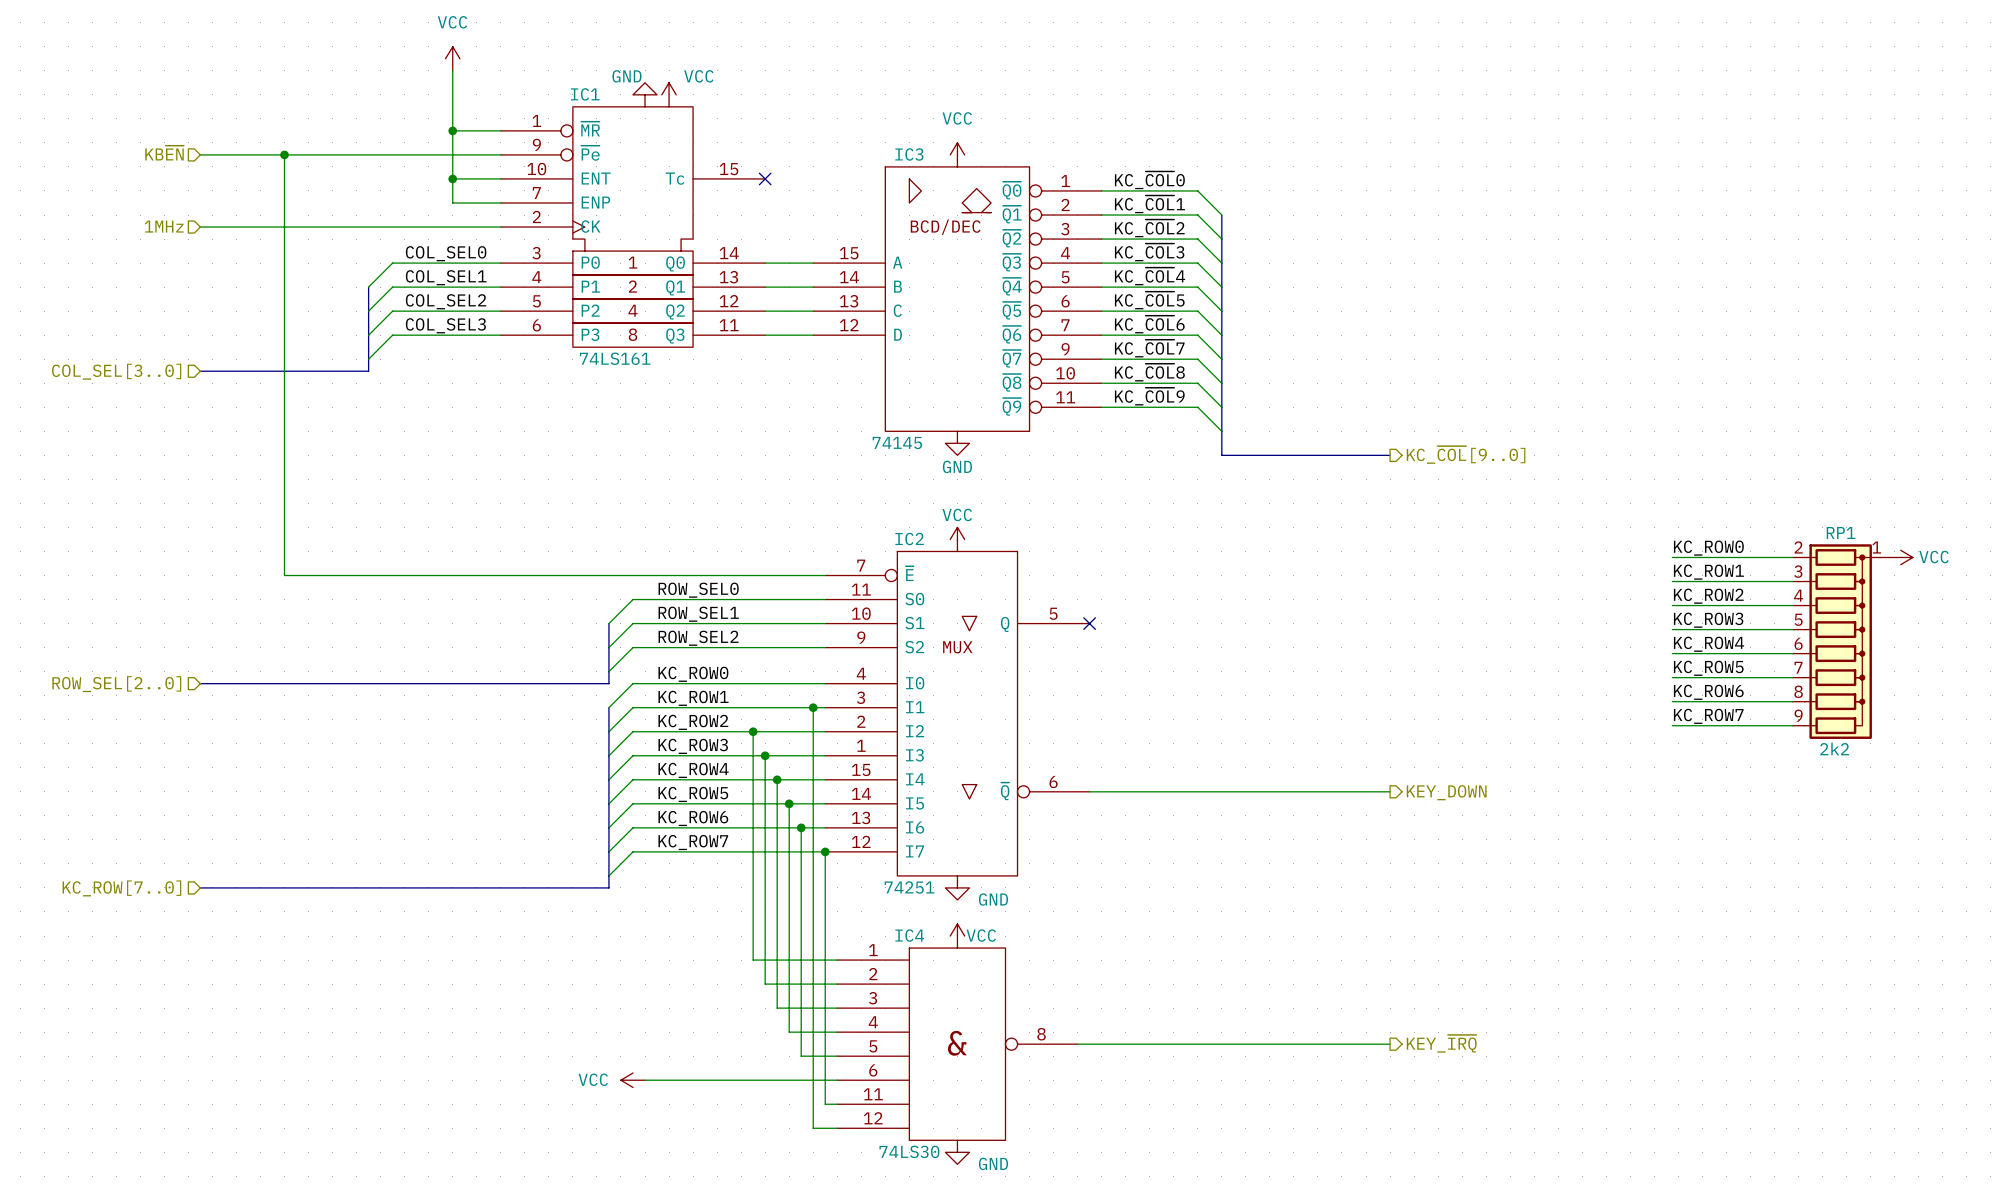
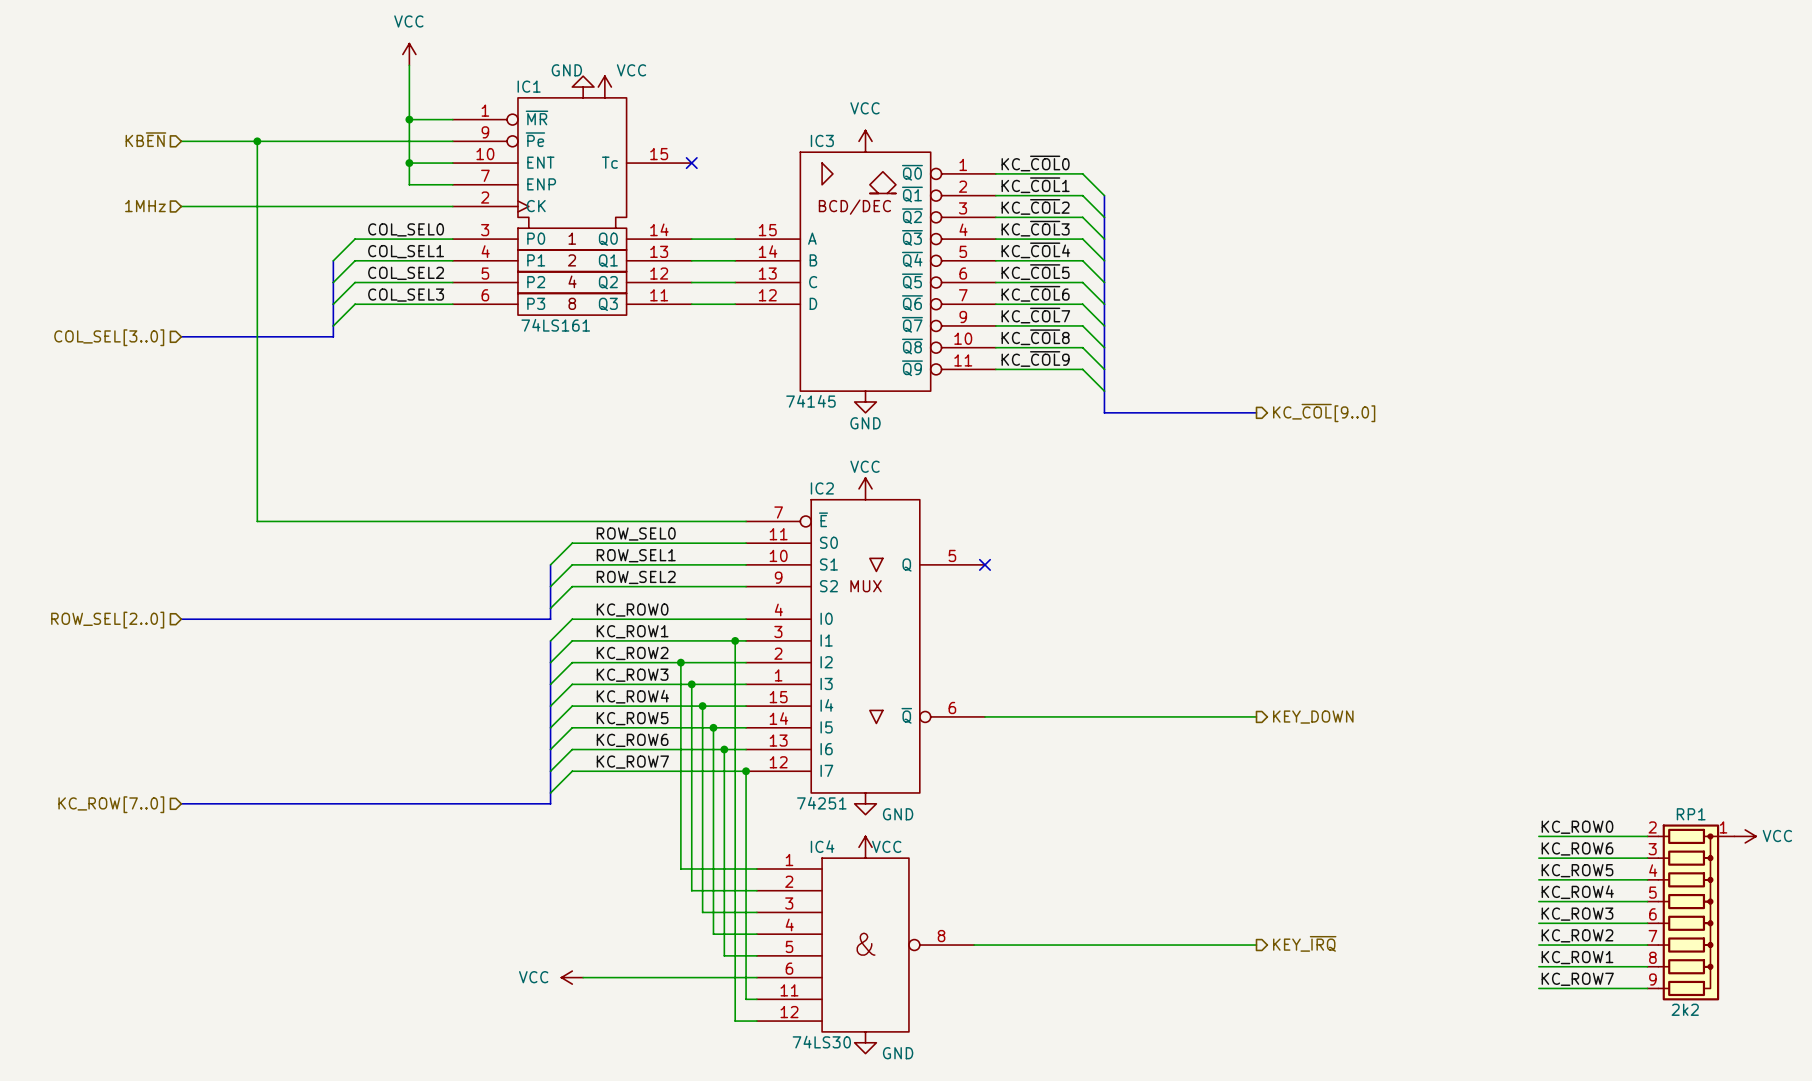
label: KC_ROW0 (1708, 548) -> none
wire: (1672, 557) (1792, 557) -> none
power symbol: VCC (1900, 557) -> none
label: KC_ROW1 (1708, 572) -> none
wire: (1672, 581) (1792, 581) -> none
label: KC_ROW2 (1708, 596) -> none
wire: (1672, 605) (1792, 605) -> none
label: KC_ROW3 (1708, 620) -> none
wire: (1672, 629) (1792, 629) -> none
RP1 position: (1840, 641) -> (1690, 912)
label: KC_ROW4 (1709, 644) -> none
wire: (1672, 653) (1792, 653) -> none
label: KC_ROW5 (1708, 668) -> none
wire: (1672, 677) (1792, 677) -> none
label: KC_ROW6 (1708, 692) -> none
wire: (1672, 701) (1792, 701) -> (1538, 836) (1647, 836)
label: KC_ROW7 (1708, 716) -> none
wire: (1672, 725) (1792, 725) -> (1538, 858) (1647, 858)
label: none -> KC_ROW0 (1577, 827)
power symbol: none -> VCC (1745, 836)
label: none -> KC_ROW6 (1577, 848)
label: none -> KC_ROW5 (1577, 870)
wire: none -> (1538, 879) (1647, 879)
label: none -> KC_ROW4 (1577, 892)
wire: none -> (1538, 901) (1647, 901)
label: none -> KC_ROW3 (1577, 914)
wire: none -> (1538, 923) (1647, 923)
label: none -> KC_ROW2 (1577, 935)
wire: none -> (1538, 945) (1647, 945)
label: none -> KC_ROW1 (1577, 957)
wire: none -> (1538, 966) (1647, 966)
label: none -> KC_ROW7 (1577, 979)
wire: none -> (1538, 988) (1647, 988)

